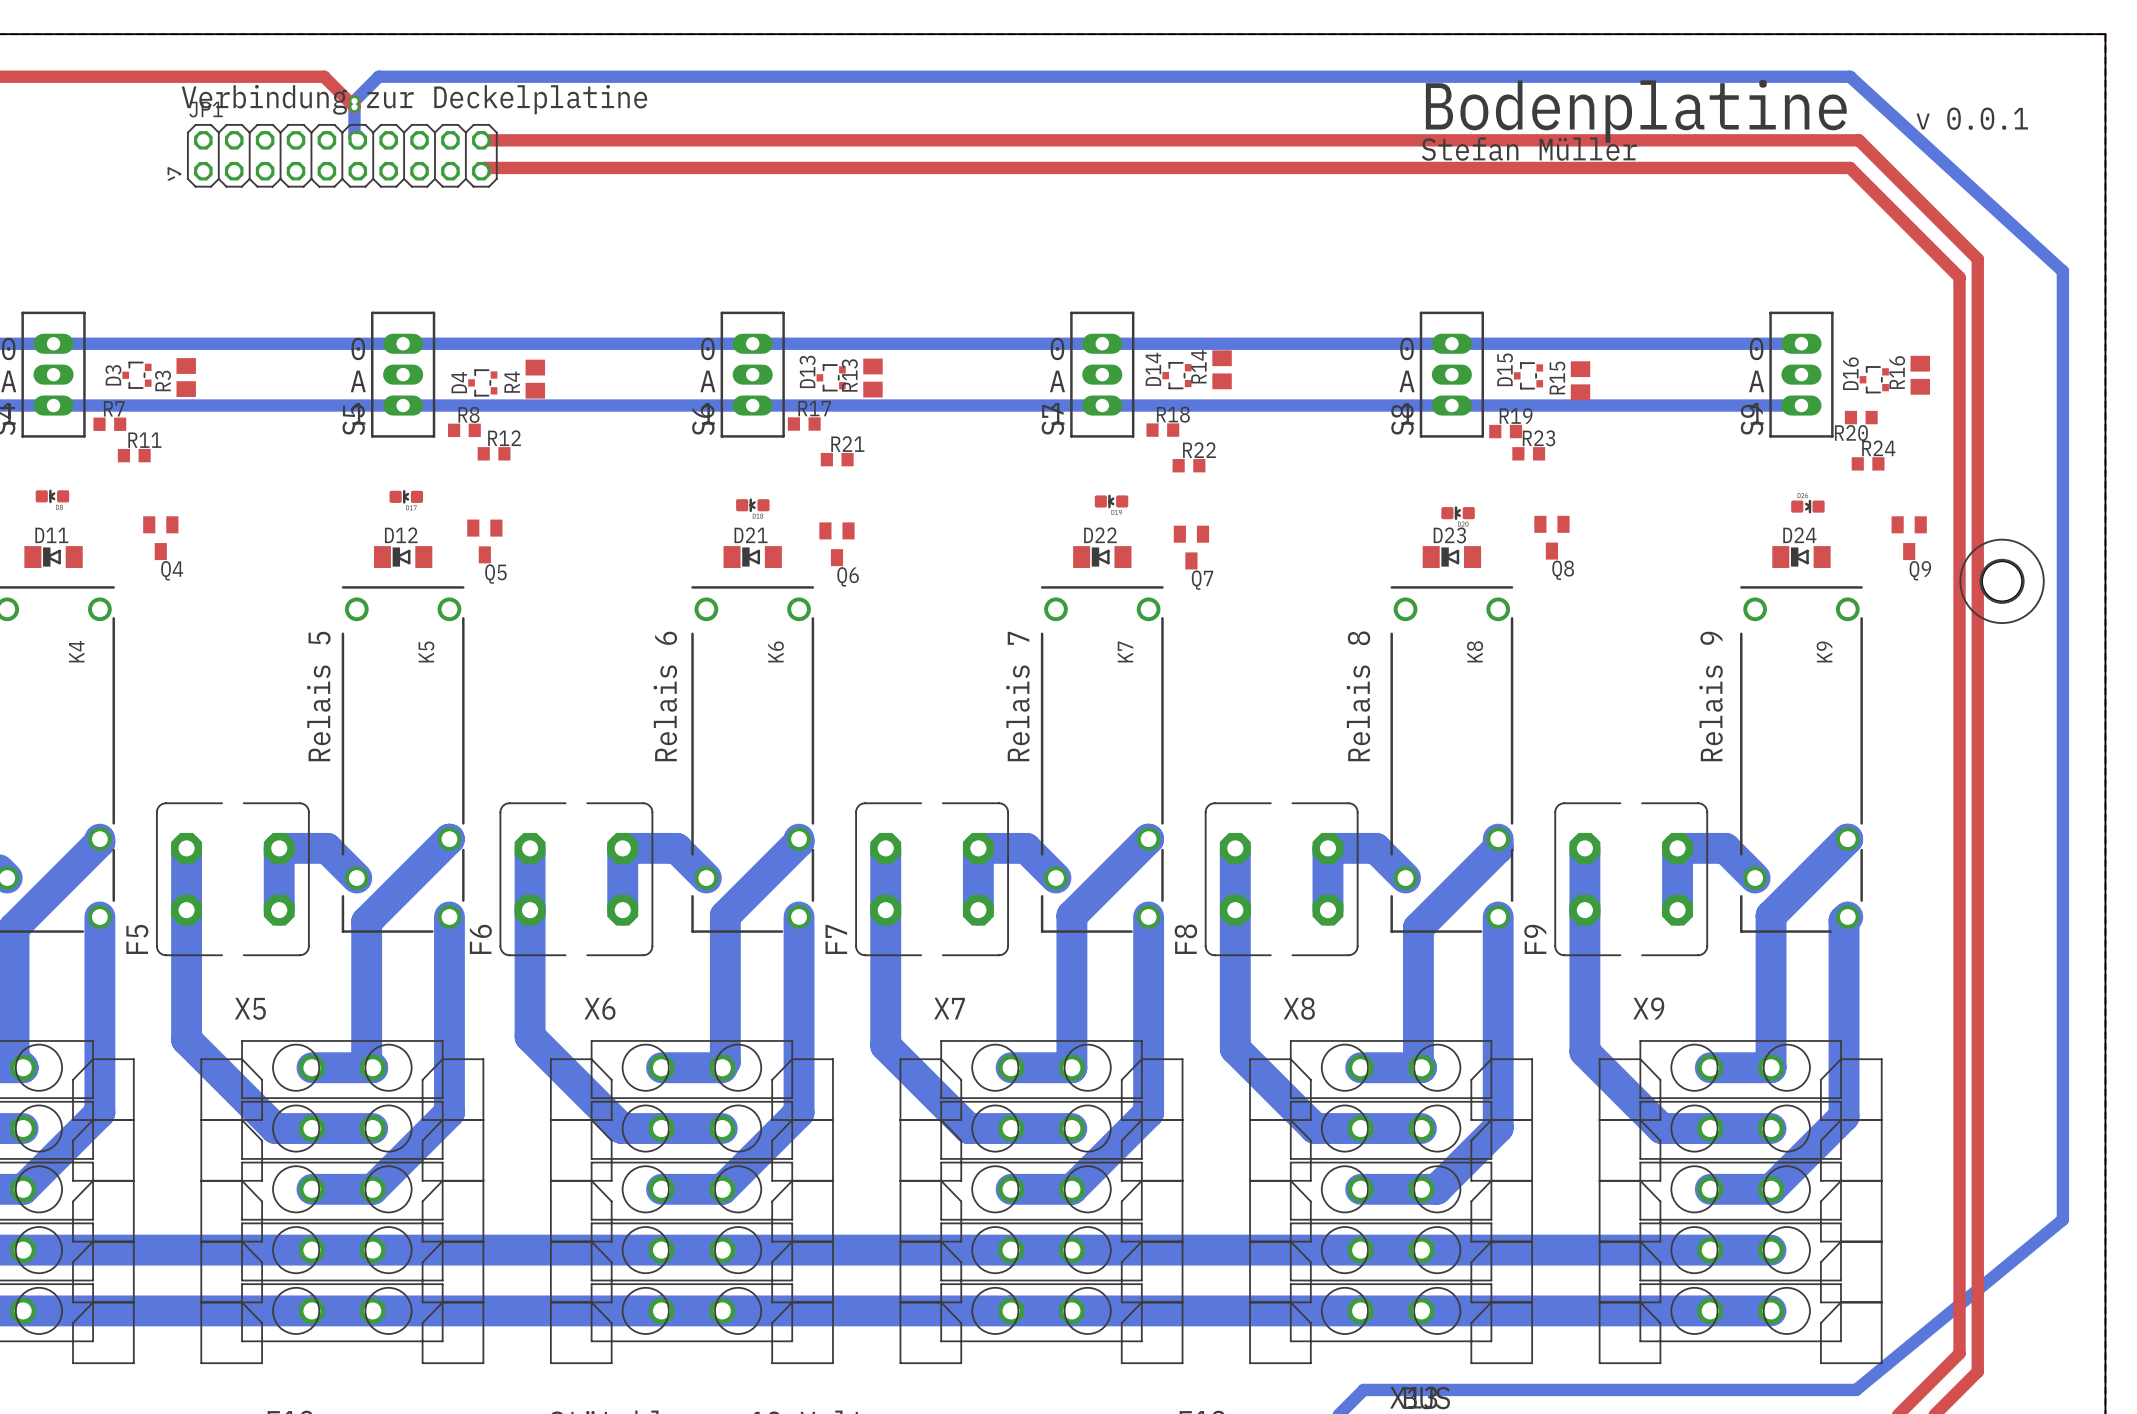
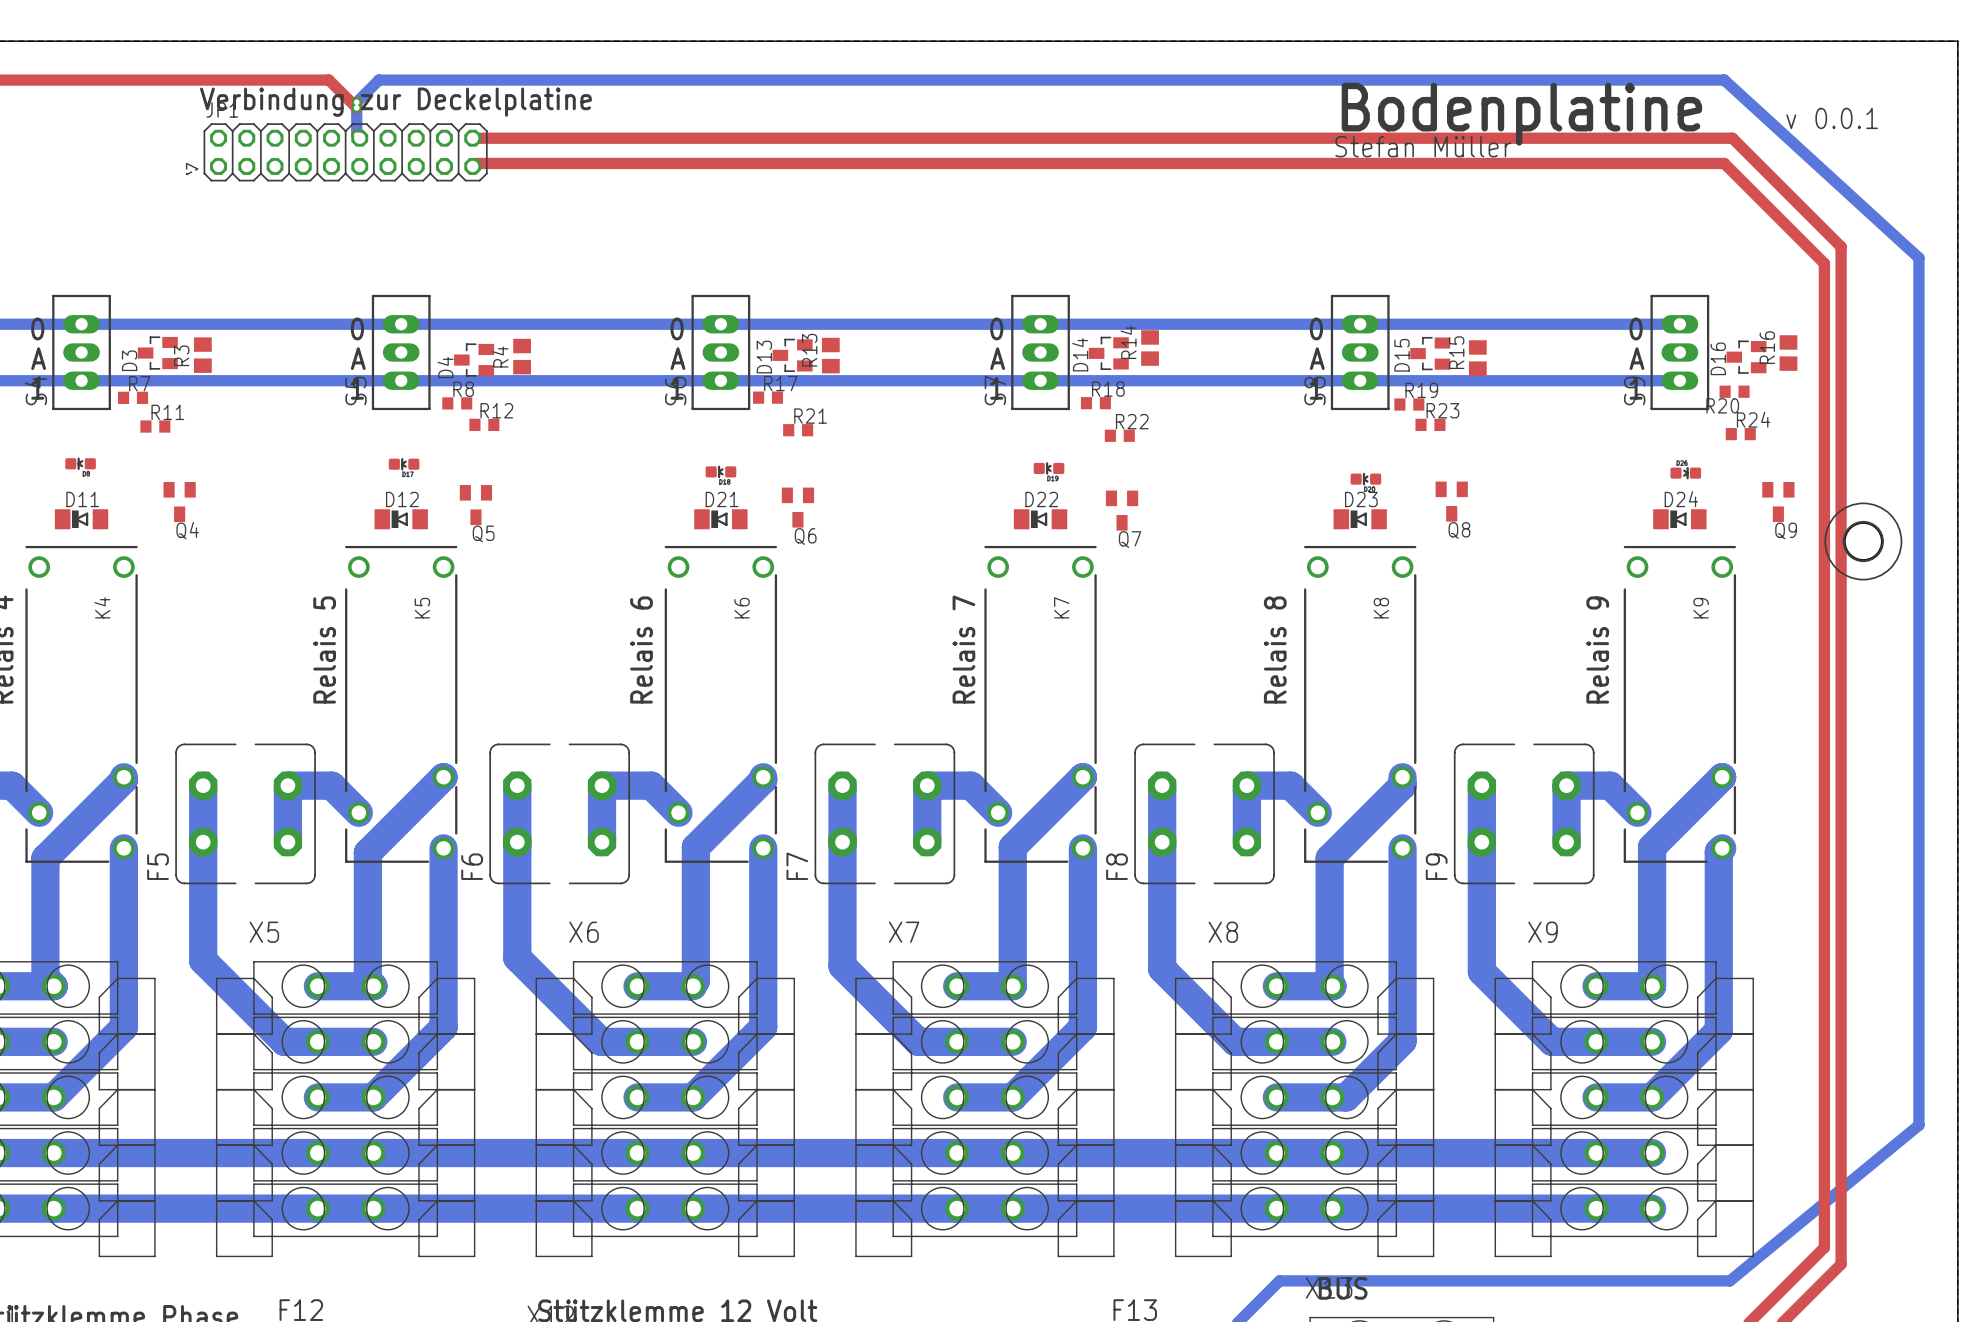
D3 footprint: [122, 361, 152, 389] -> [137, 336, 178, 370]
D14 footprint: [1162, 361, 1192, 390] -> [1088, 336, 1129, 371]
D15 footprint: [1513, 362, 1544, 390] -> [1410, 336, 1451, 371]
D13 footprint: [816, 364, 846, 392] -> [772, 338, 813, 373]
D16 footprint: [1859, 366, 1889, 394] -> [1726, 340, 1767, 374]
D4 footprint: [468, 369, 498, 397] -> [454, 343, 495, 377]

